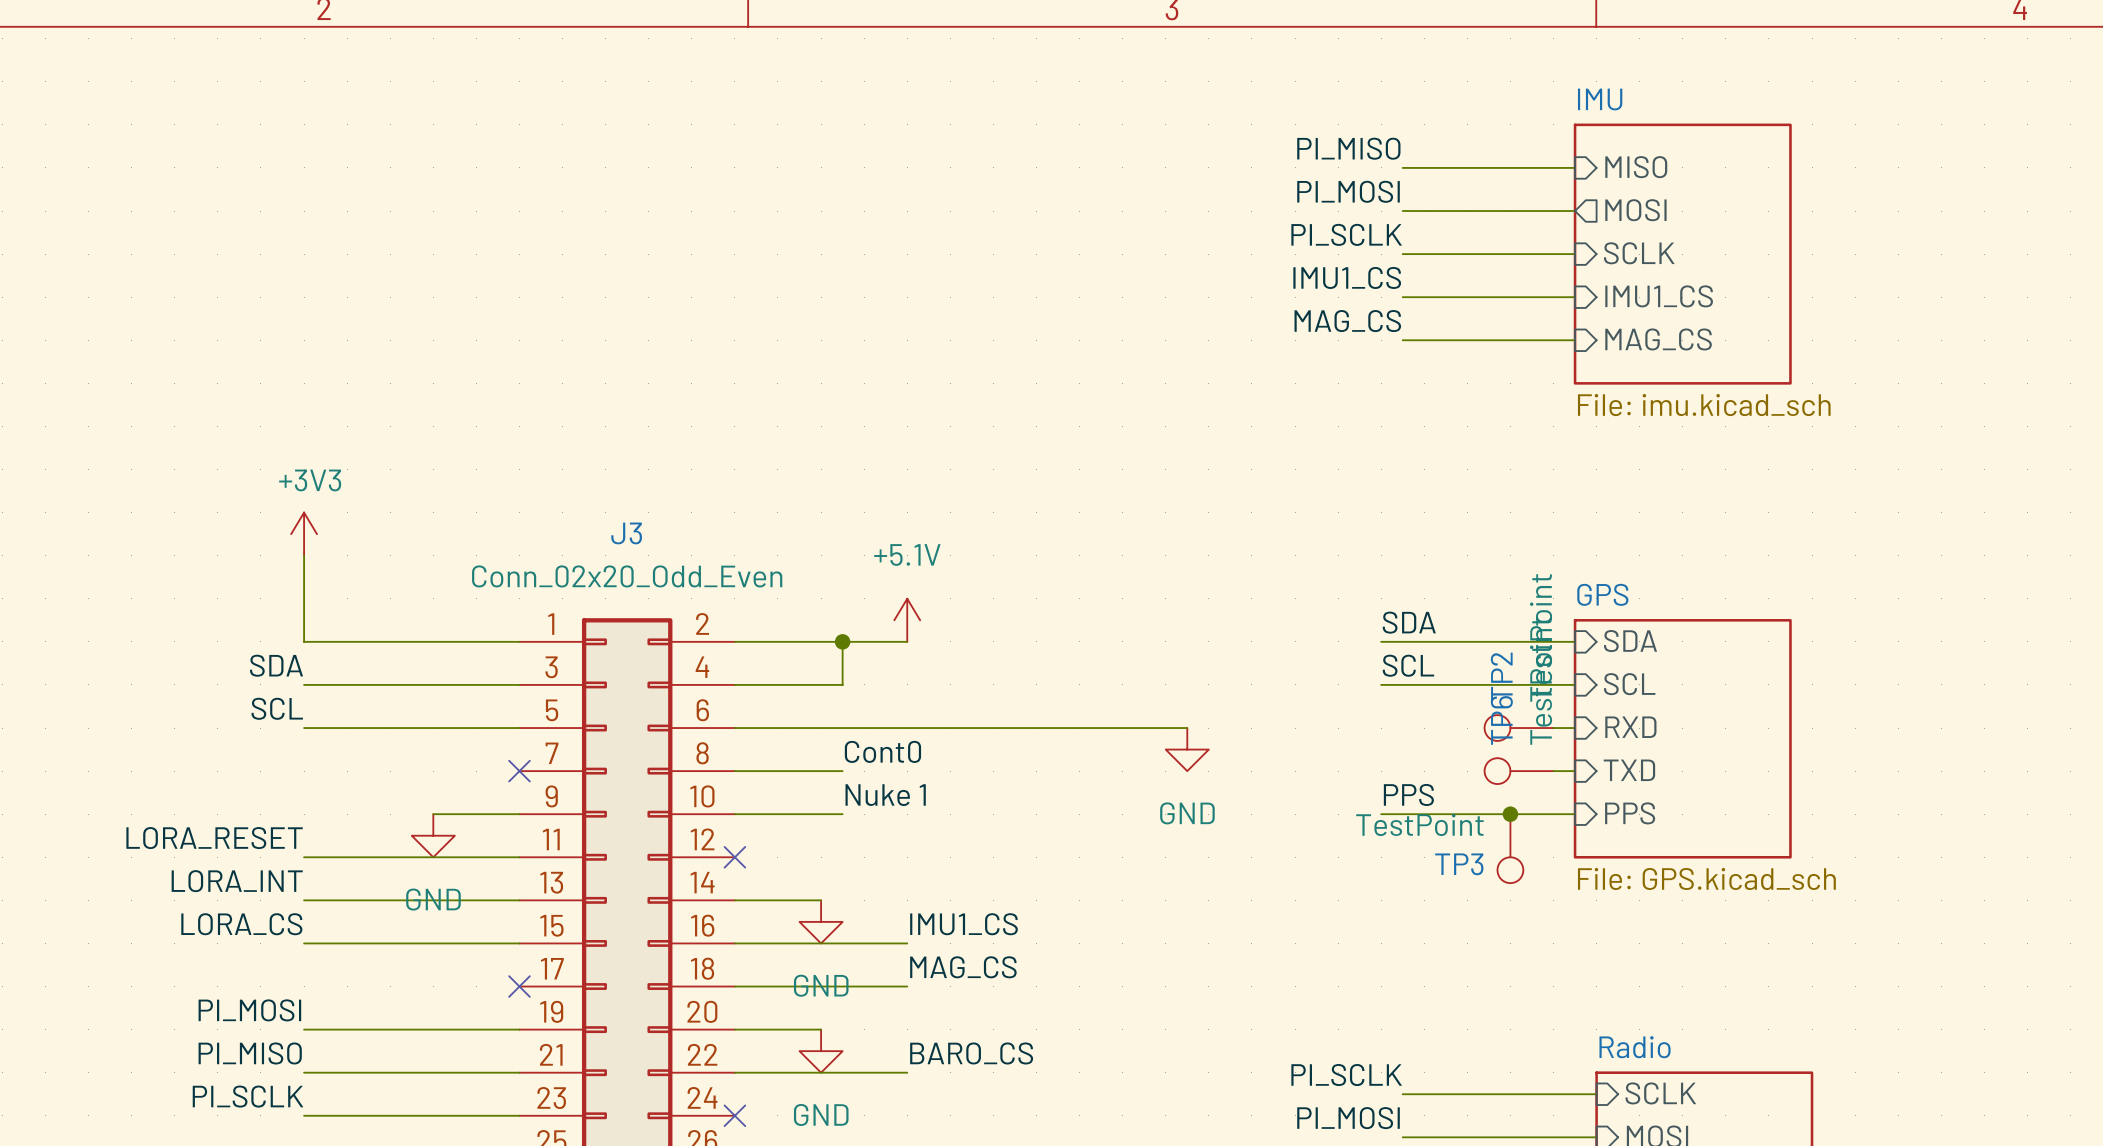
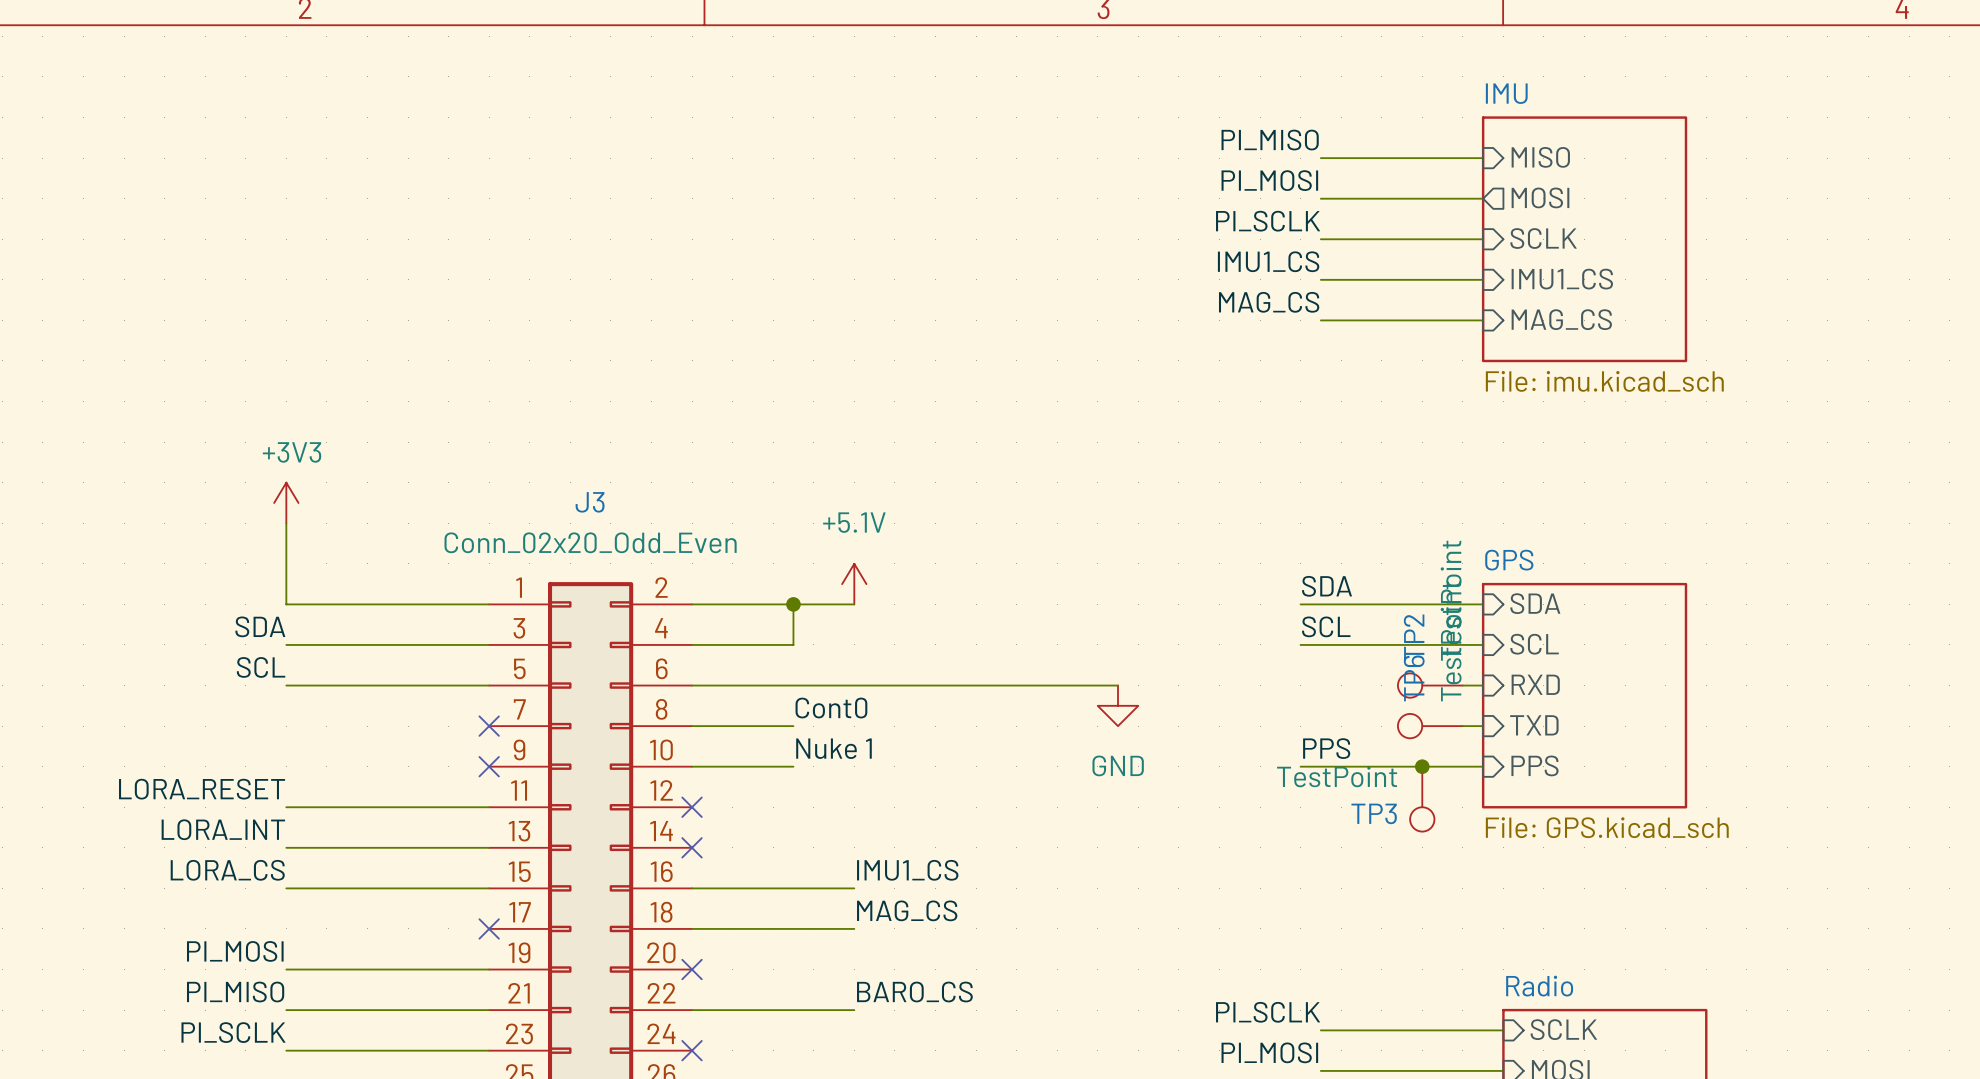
wire: (433, 814) (519, 814) -> none
no-connect mark: none -> (489, 766)
power symbol: GND (433, 835) -> none
wire: (734, 900) (821, 900) -> none
no-connect mark: none -> (692, 847)
power symbol: GND (821, 921) -> none
wire: (734, 1029) (821, 1029) -> none
no-connect mark: none -> (692, 969)
power symbol: GND (821, 1051) -> none

